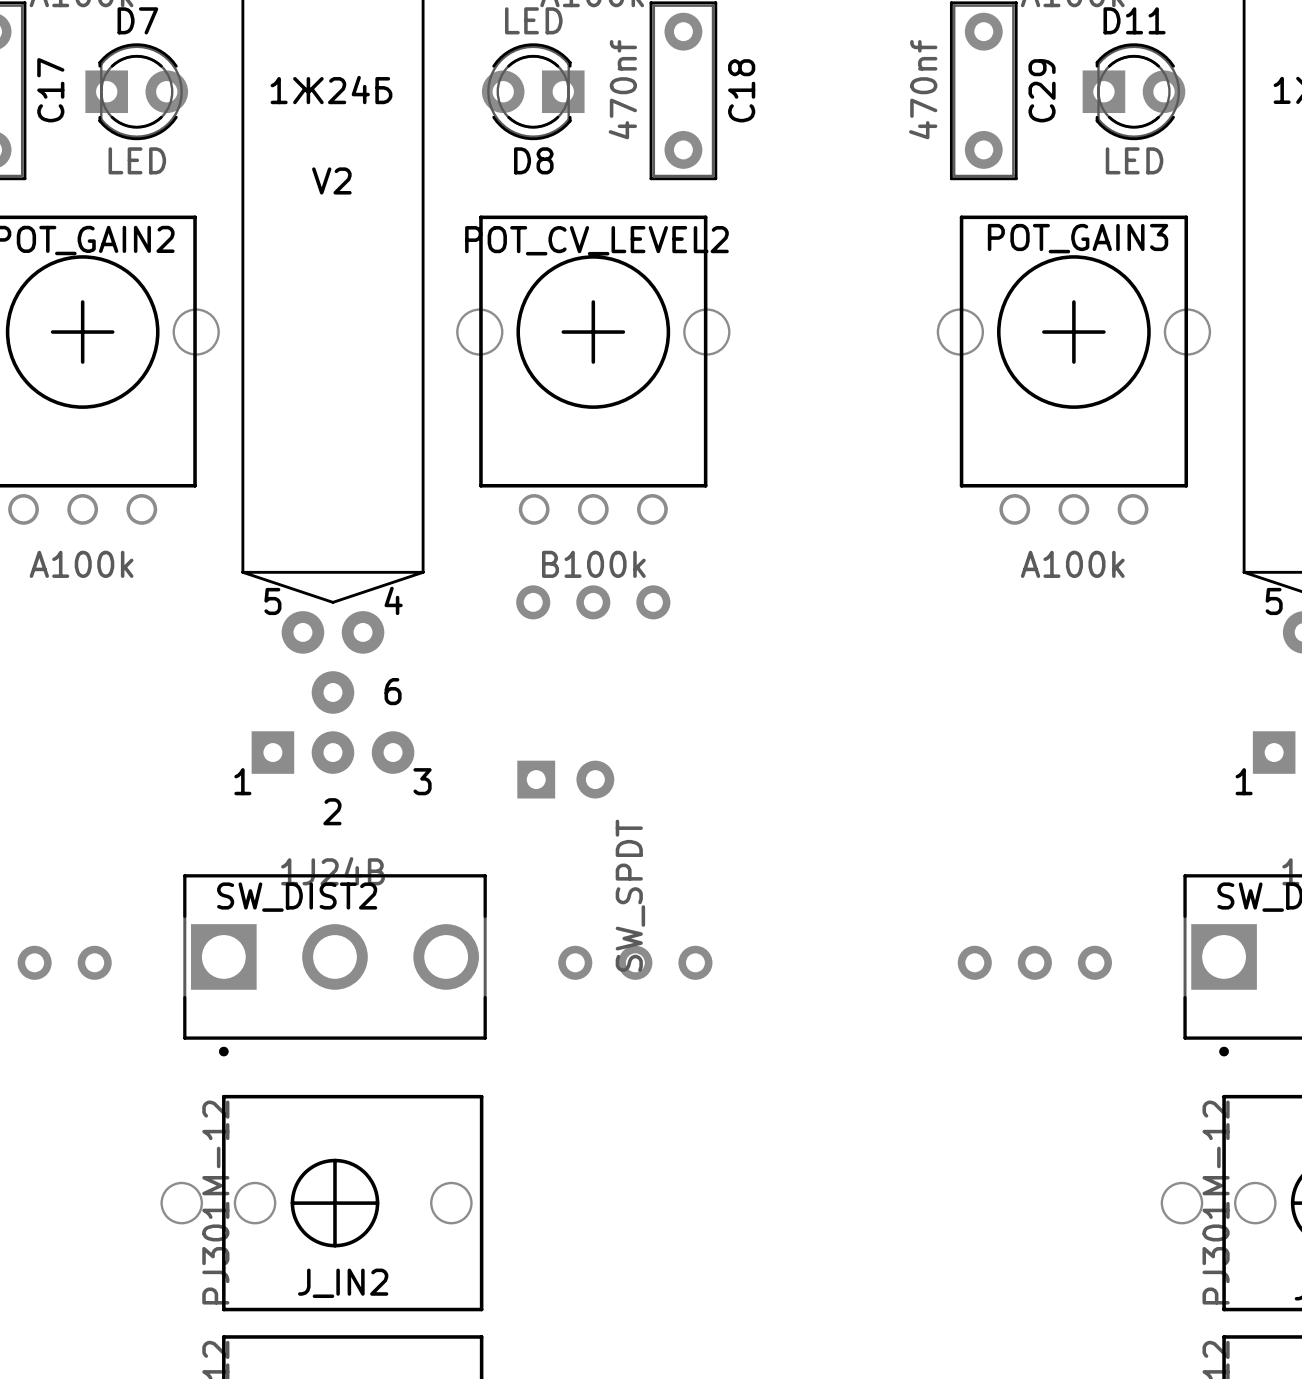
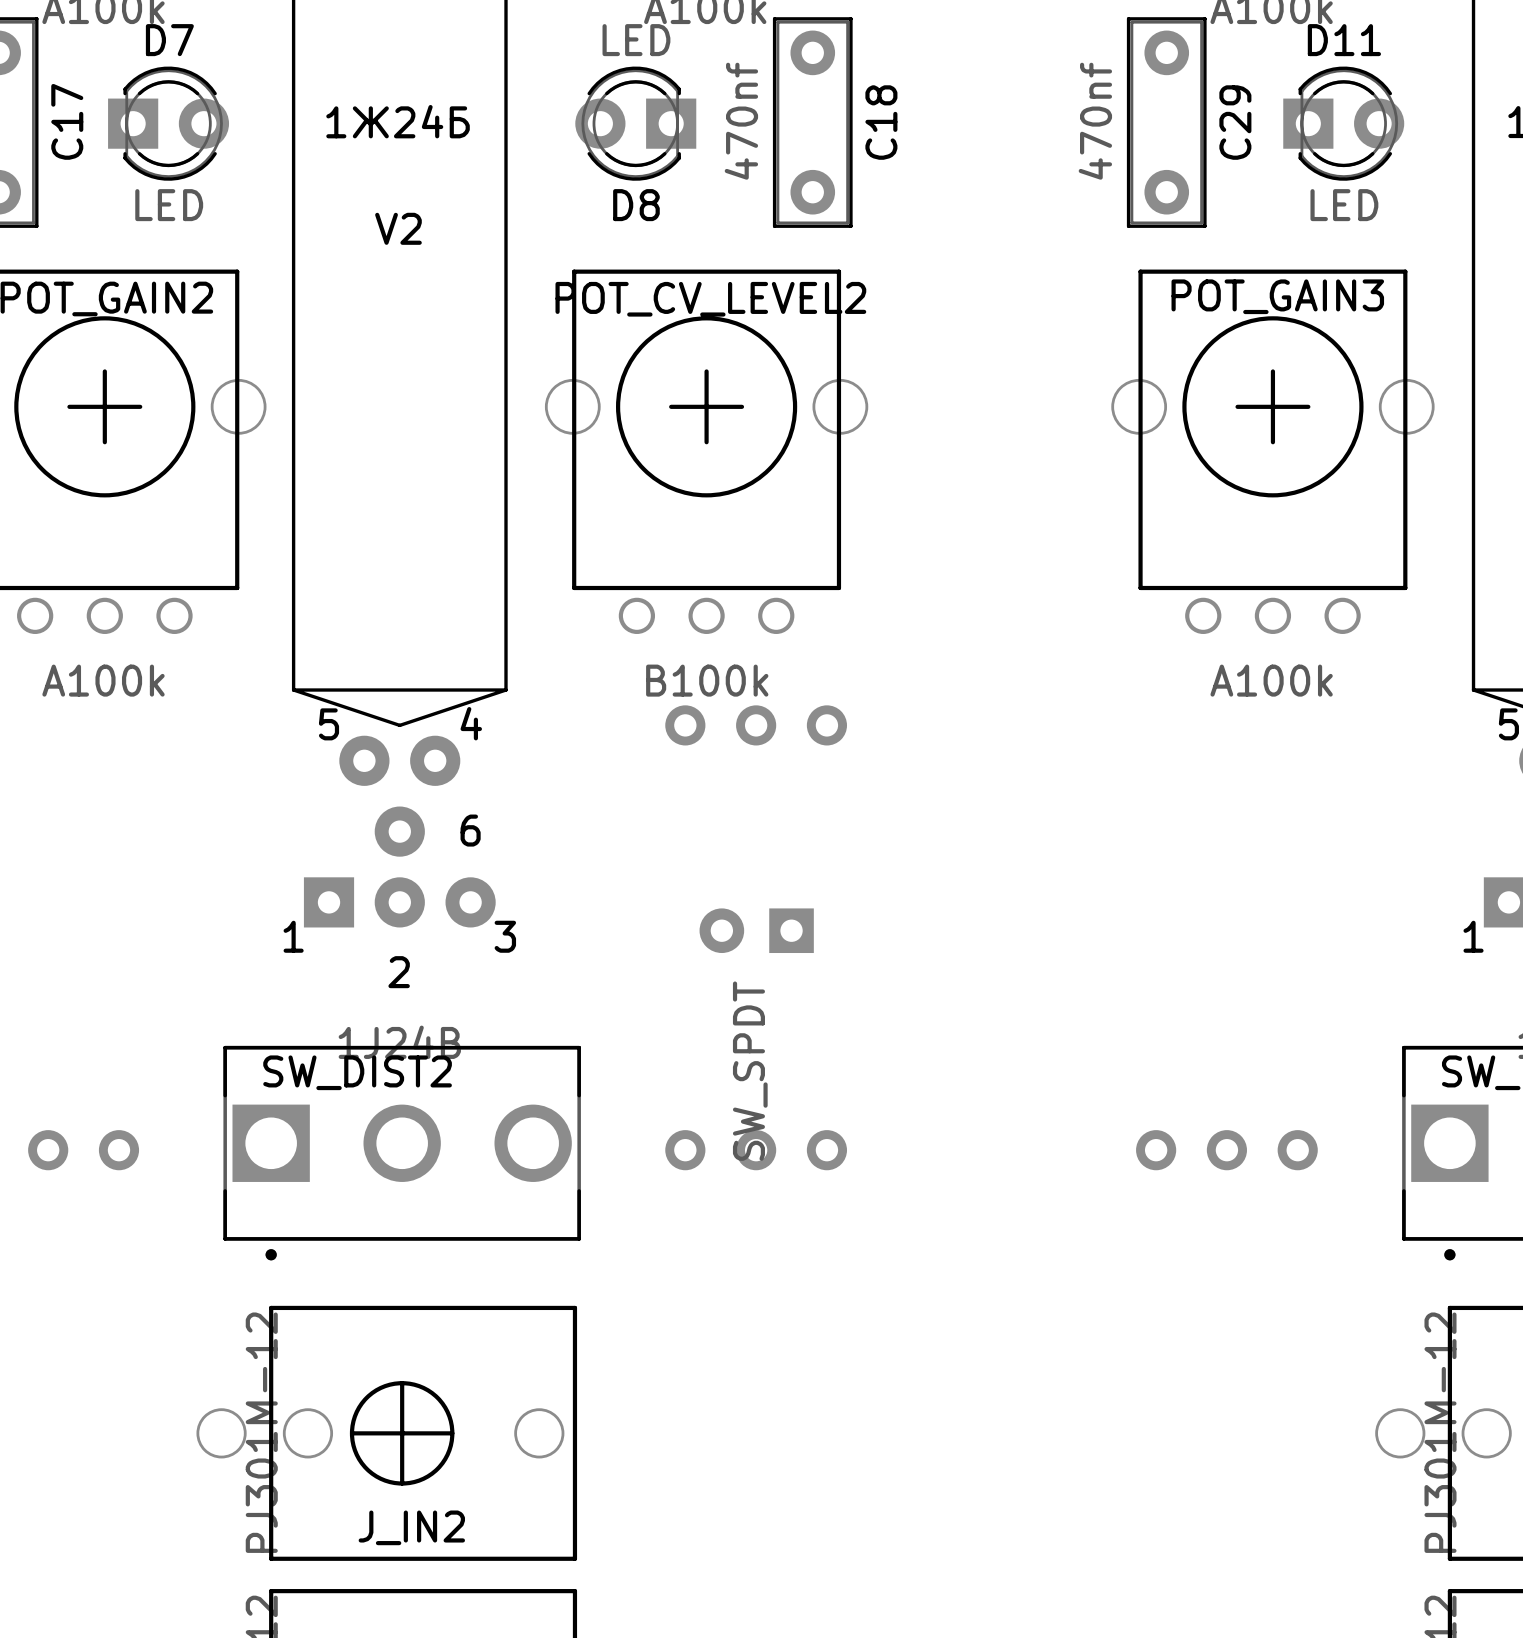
part position: (593, 602) -> (756, 725)
part rotation: 0° (565, 779) -> 180° (756, 930)
part position: (565, 779) -> (756, 930)

